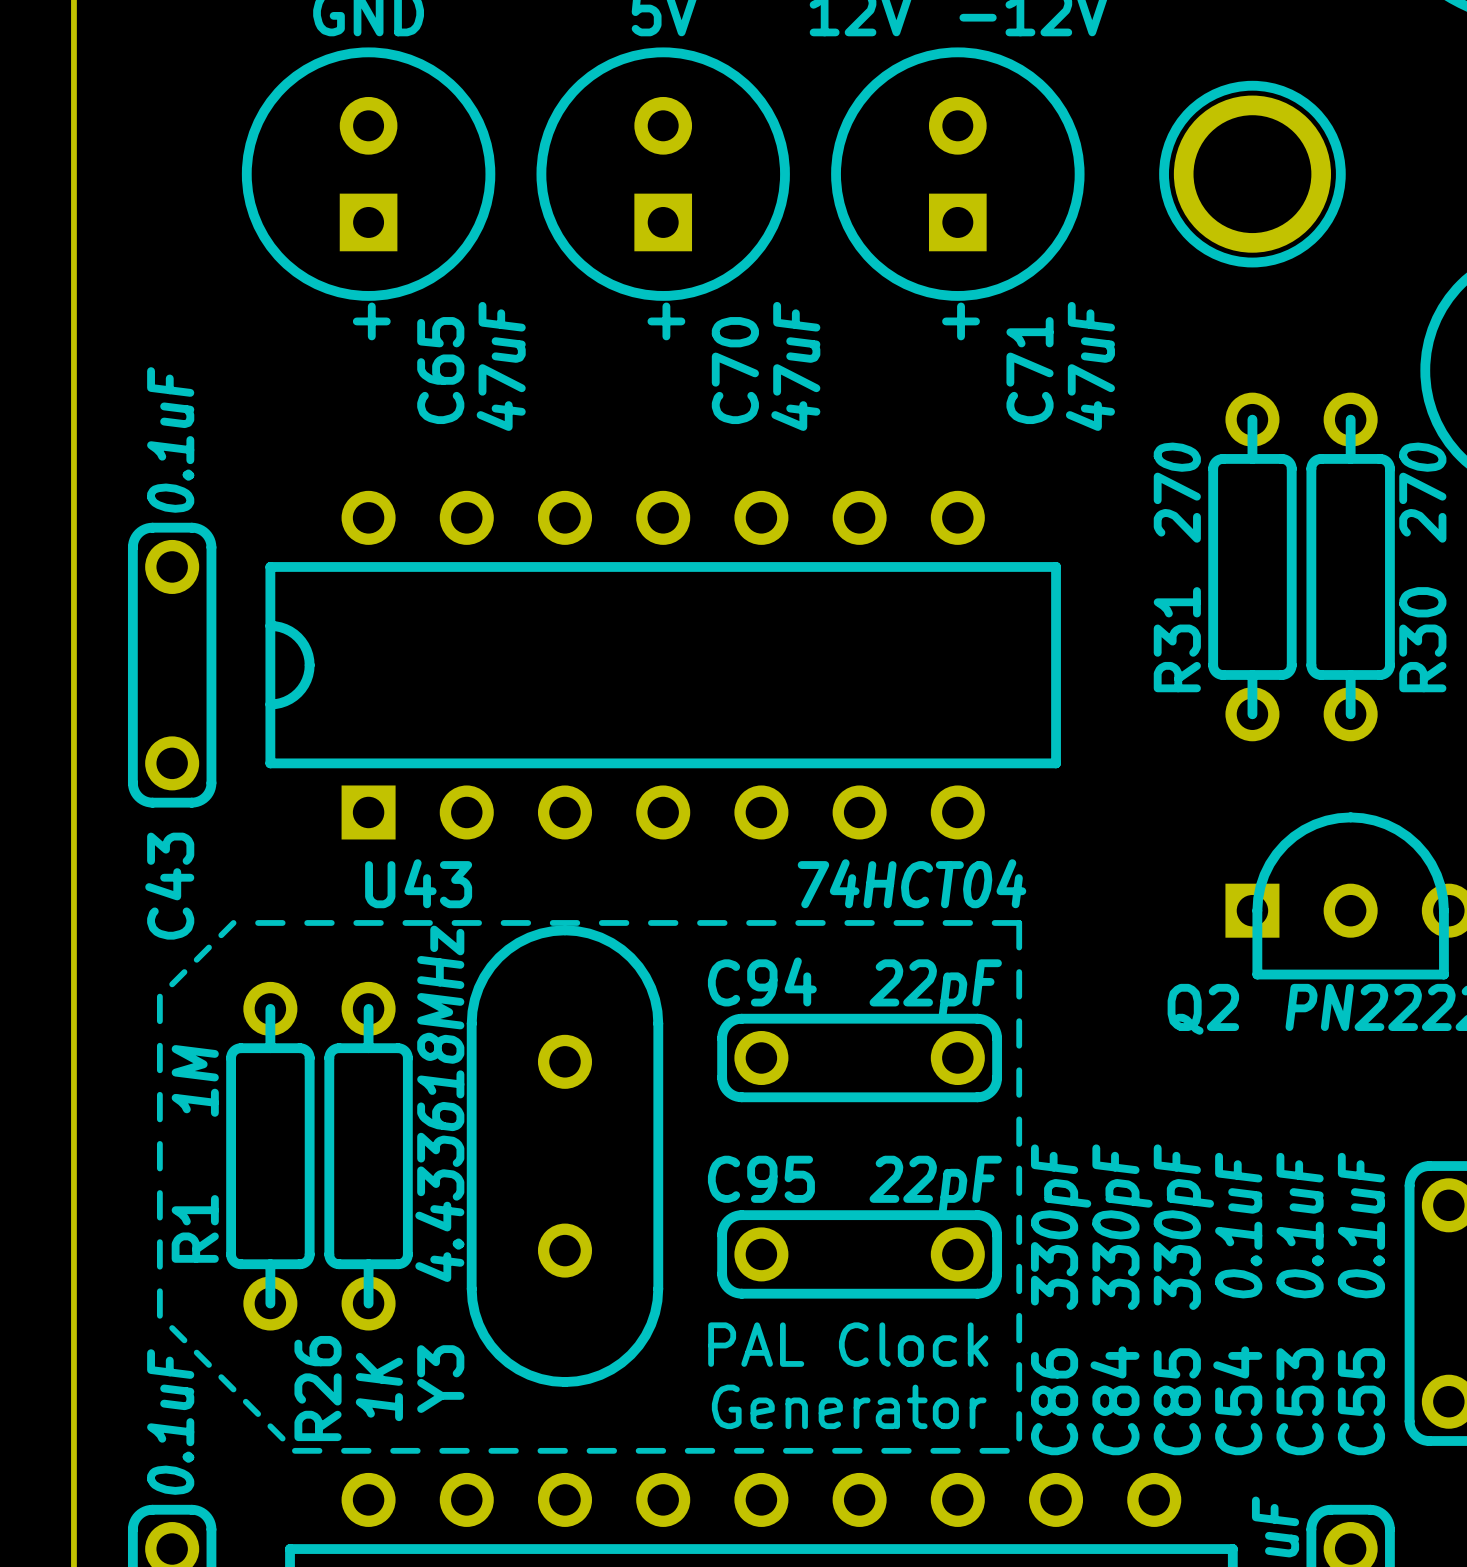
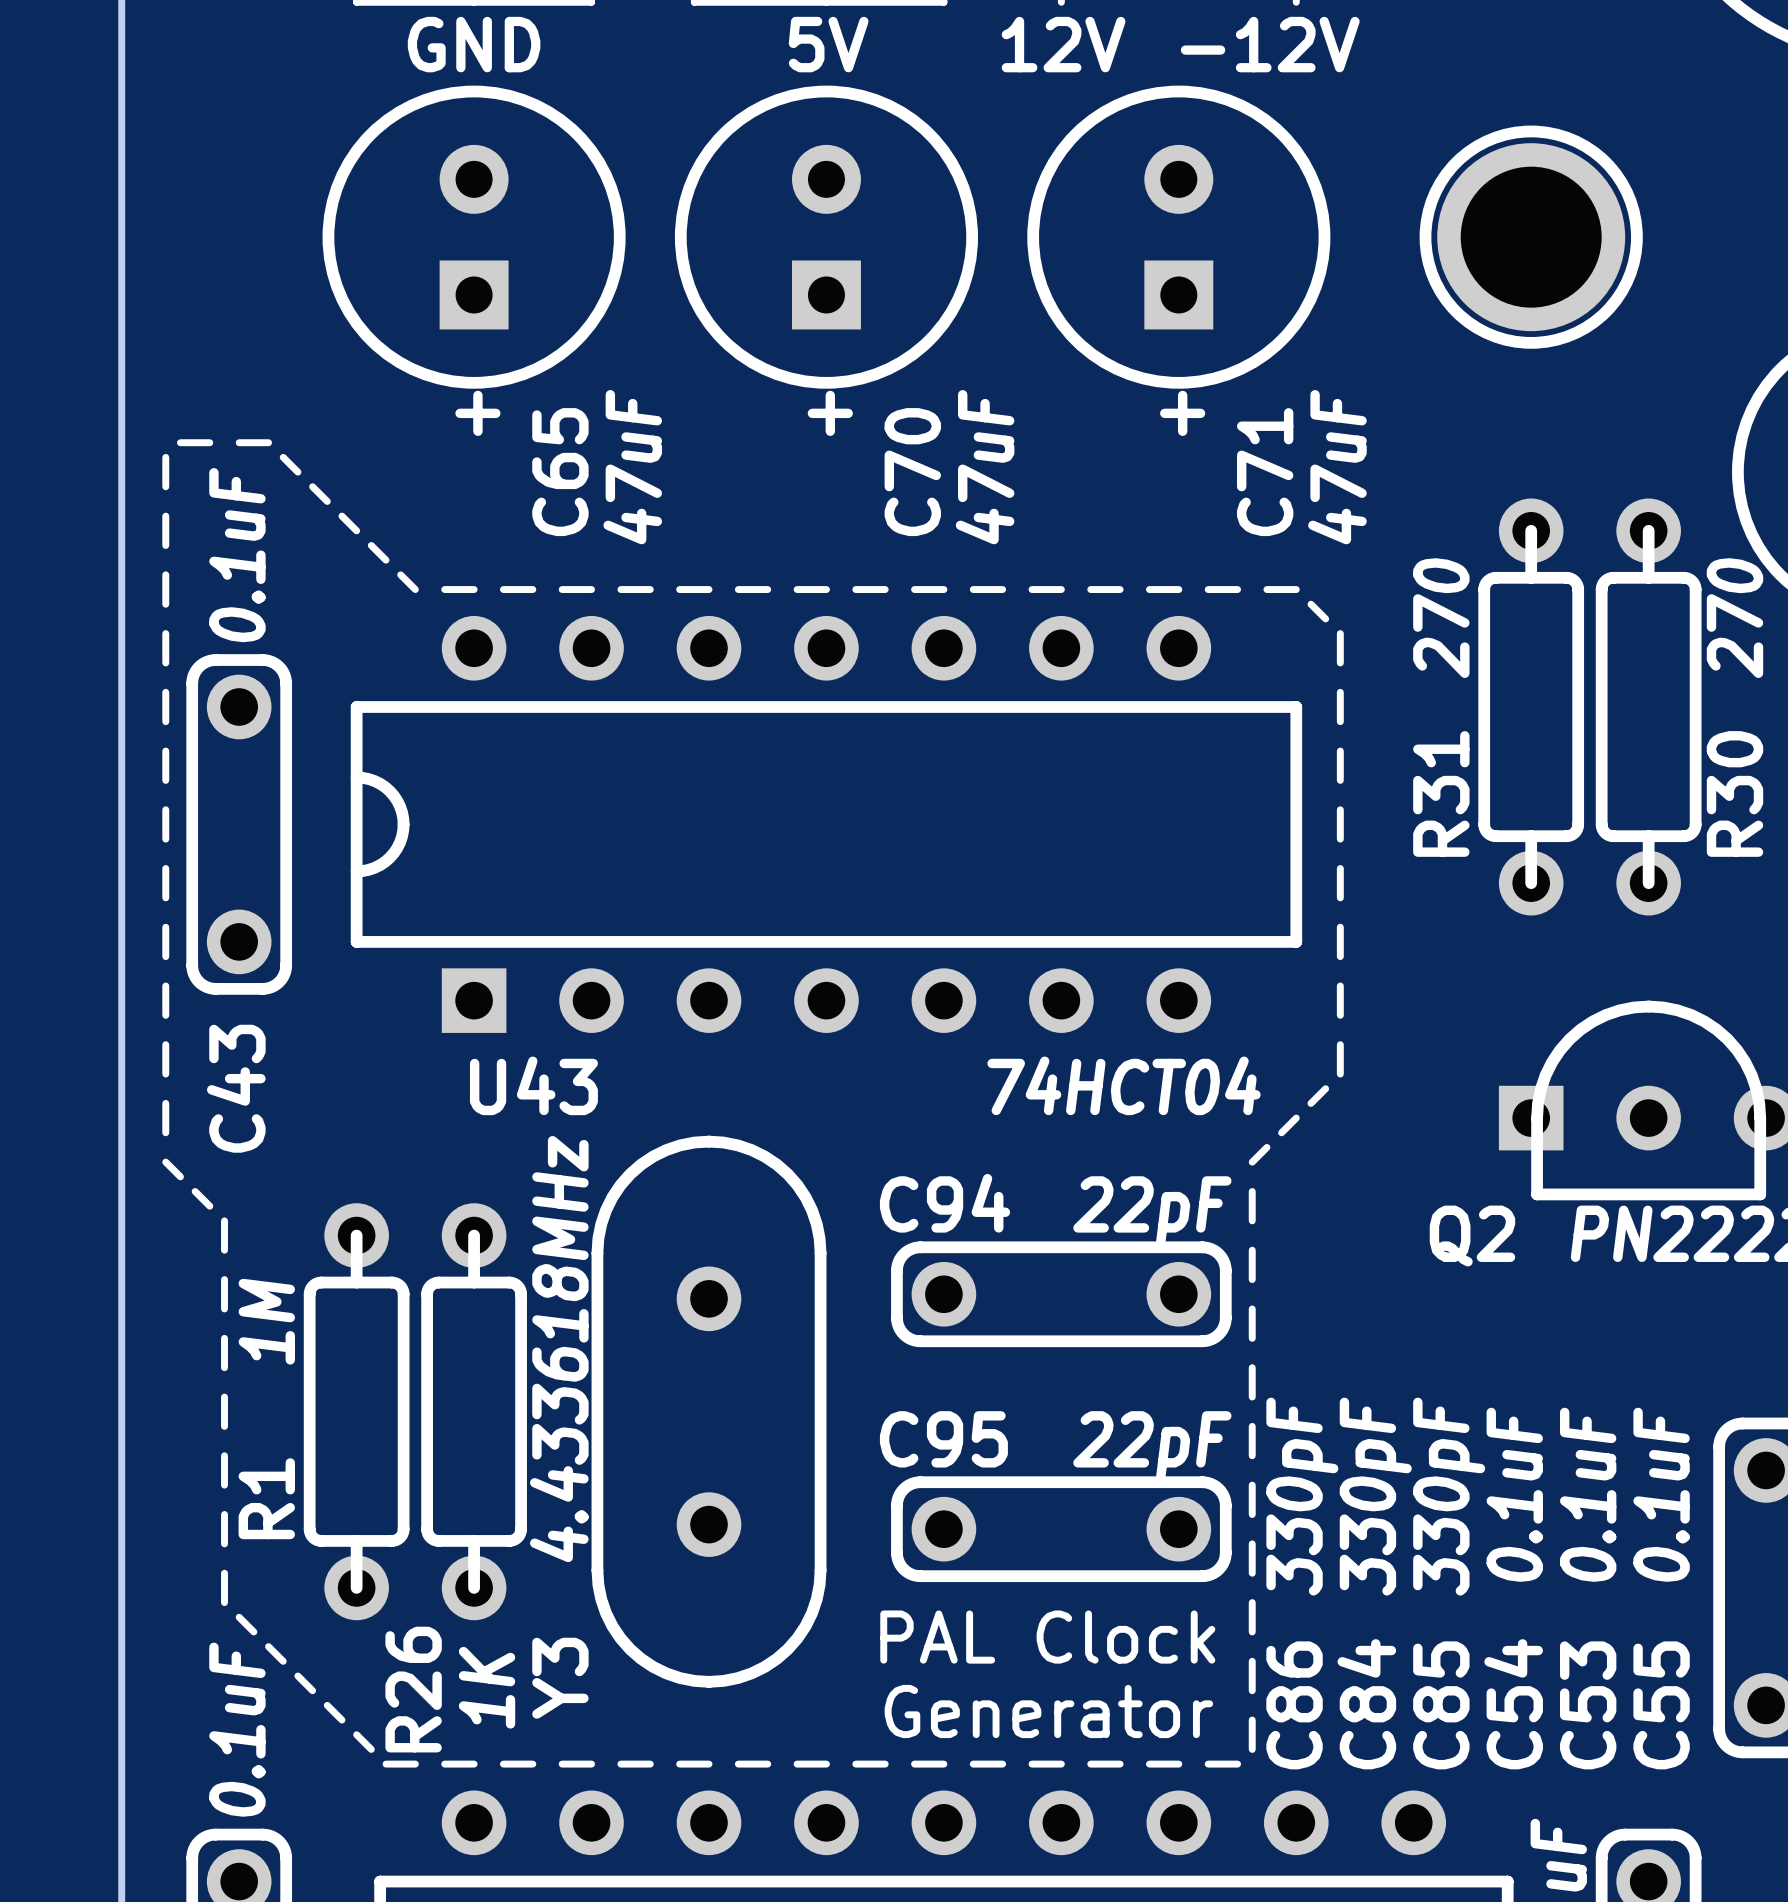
line: none -> (180, 442) (209, 442)
line: none -> (165, 457) (165, 486)
line: none -> (283, 457) (297, 472)
line: none -> (312, 486) (327, 501)
line: none -> (165, 516) (165, 545)
line: none -> (341, 516) (356, 530)
line: none -> (371, 545) (386, 560)
line: none -> (165, 574) (165, 604)
line: none -> (400, 574) (415, 589)
line: none -> (1266, 589) (1296, 589)
line: none -> (1310, 604) (1325, 618)
line: none -> (165, 633) (165, 662)
line: none -> (1340, 633) (1340, 662)
line: none -> (165, 692) (165, 721)
line: none -> (1340, 692) (1340, 721)
line: none -> (165, 751) (165, 780)
line: none -> (1340, 751) (1340, 780)
line: none -> (165, 809) (165, 839)
line: none -> (1340, 809) (1340, 839)
line: none -> (165, 868) (165, 897)
line: none -> (1340, 868) (1340, 897)
line: none -> (165, 927) (165, 956)
line: none -> (1340, 927) (1340, 956)
line: none -> (165, 985) (165, 1015)
line: none -> (1340, 985) (1340, 1015)
line: none -> (165, 1044) (165, 1074)
line: none -> (1340, 1044) (1340, 1074)
line: none -> (165, 1103) (165, 1132)
line: (233, 922) (221, 935) -> (1325, 1088) (1310, 1103)
line: (258, 922) (282, 922) -> (444, 589) (474, 589)
line: (307, 922) (331, 922) -> (503, 589) (532, 589)
line: (356, 922) (380, 922) -> (562, 589) (591, 589)
line: (405, 922) (429, 922) -> (620, 589) (650, 589)
line: (454, 922) (479, 922) -> (679, 589) (709, 589)
line: (503, 922) (528, 922) -> (738, 589) (767, 589)
line: (552, 922) (577, 922) -> (797, 589) (826, 589)
line: (601, 922) (626, 922) -> (855, 589) (885, 589)
line: (650, 922) (675, 922) -> (914, 589) (943, 589)
line: (700, 922) (724, 922) -> (973, 589) (1002, 589)
line: (749, 922) (773, 922) -> (1032, 589) (1061, 589)
line: (798, 922) (822, 922) -> (1090, 589) (1120, 589)
line: (847, 922) (871, 922) -> (1149, 589) (1178, 589)
line: (896, 922) (920, 922) -> (239, 442) (268, 442)
line: (945, 922) (970, 922) -> (1208, 589) (1237, 589)
line: (994, 922) (1019, 922) (1019, 947) -> (1266, 1147) (1252, 1162)
line: none -> (165, 1162) (180, 1176)
line: (208, 947) (196, 959) -> (1296, 1118) (1281, 1132)
line: none -> (195, 1191) (209, 1206)
line: (184, 972) (172, 984) -> none

